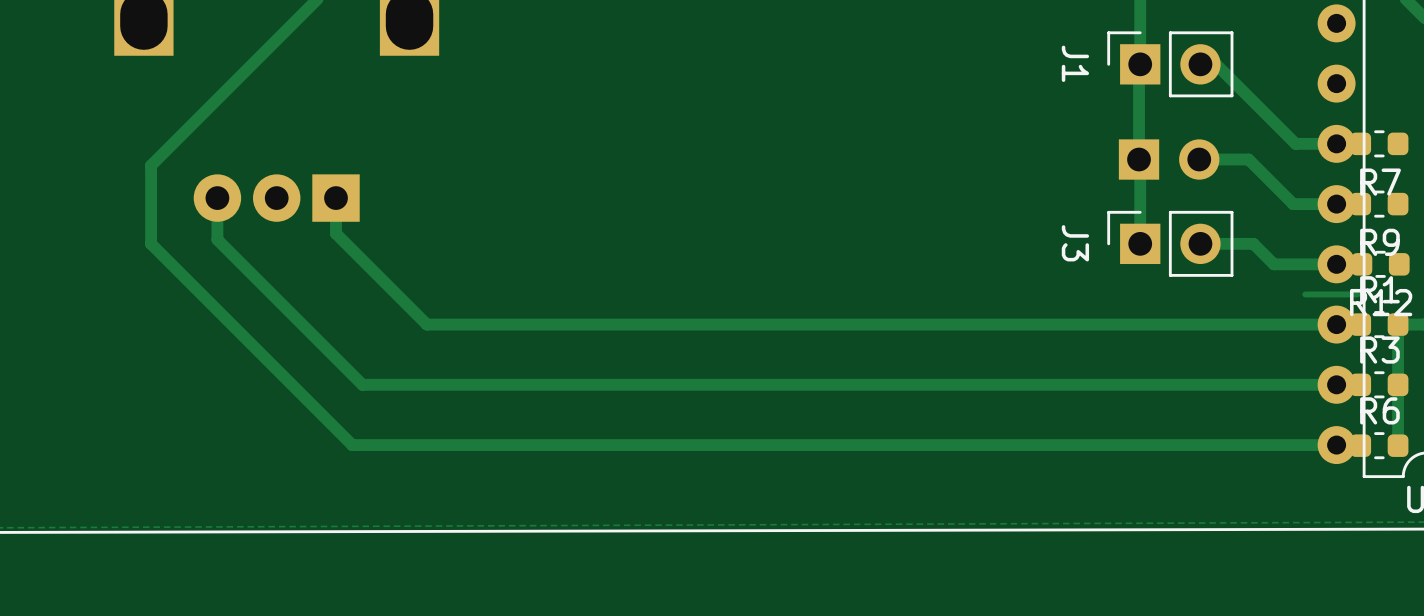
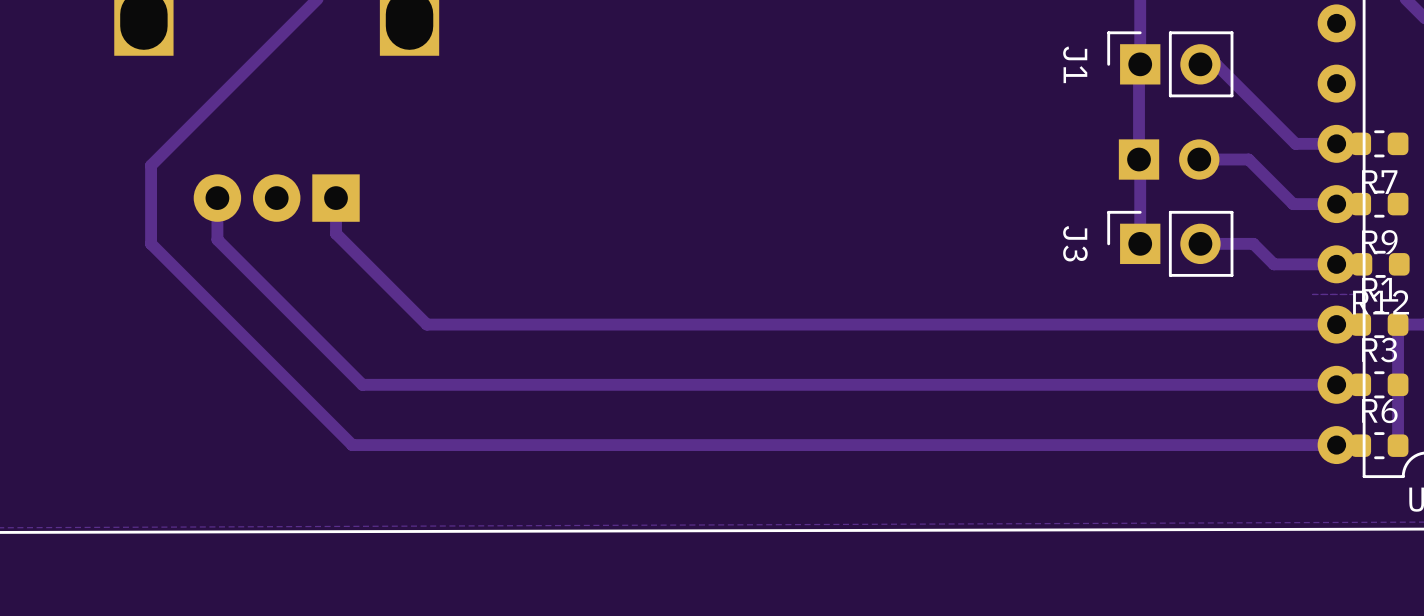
track: (1357, 294) (1305, 294) -> none

